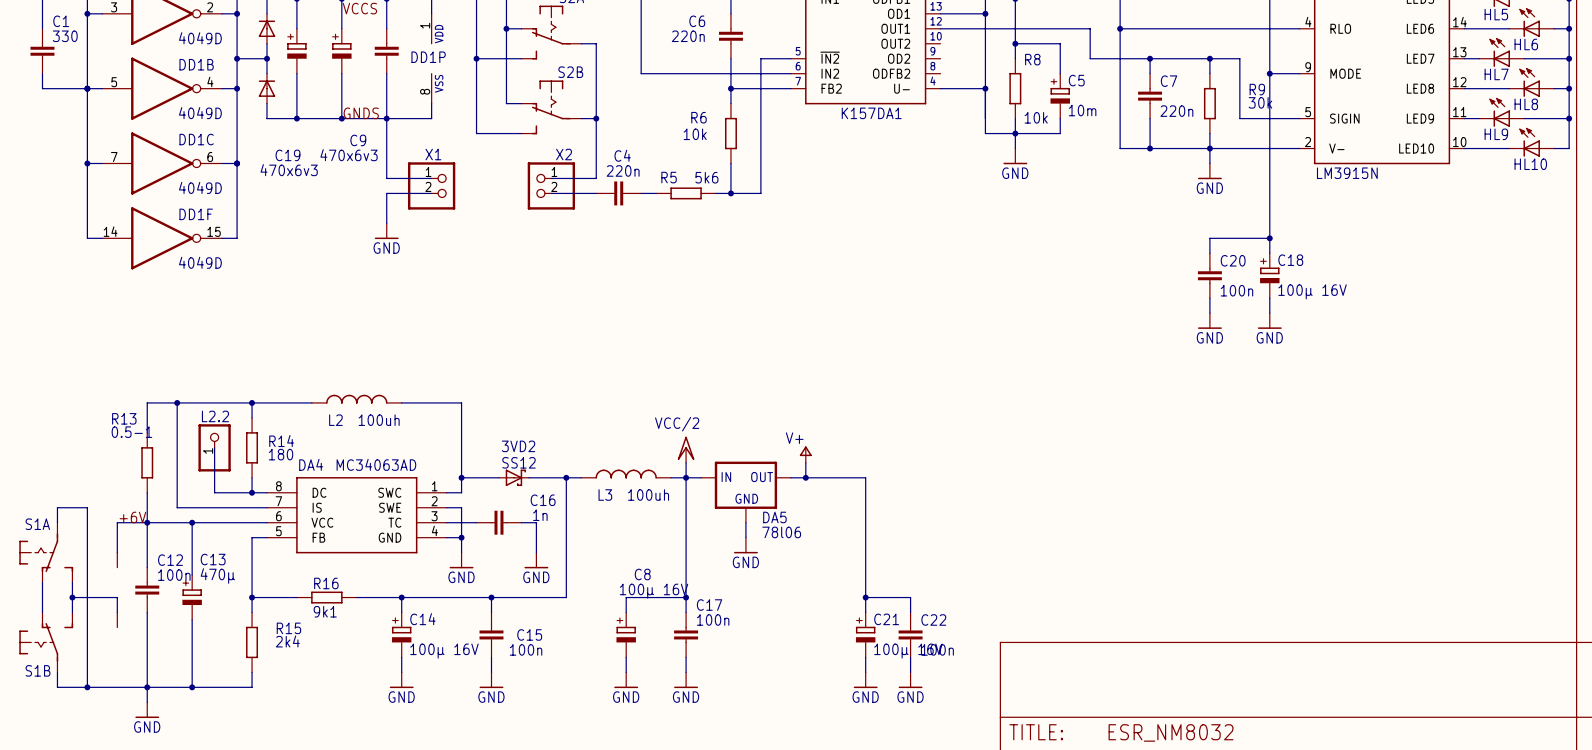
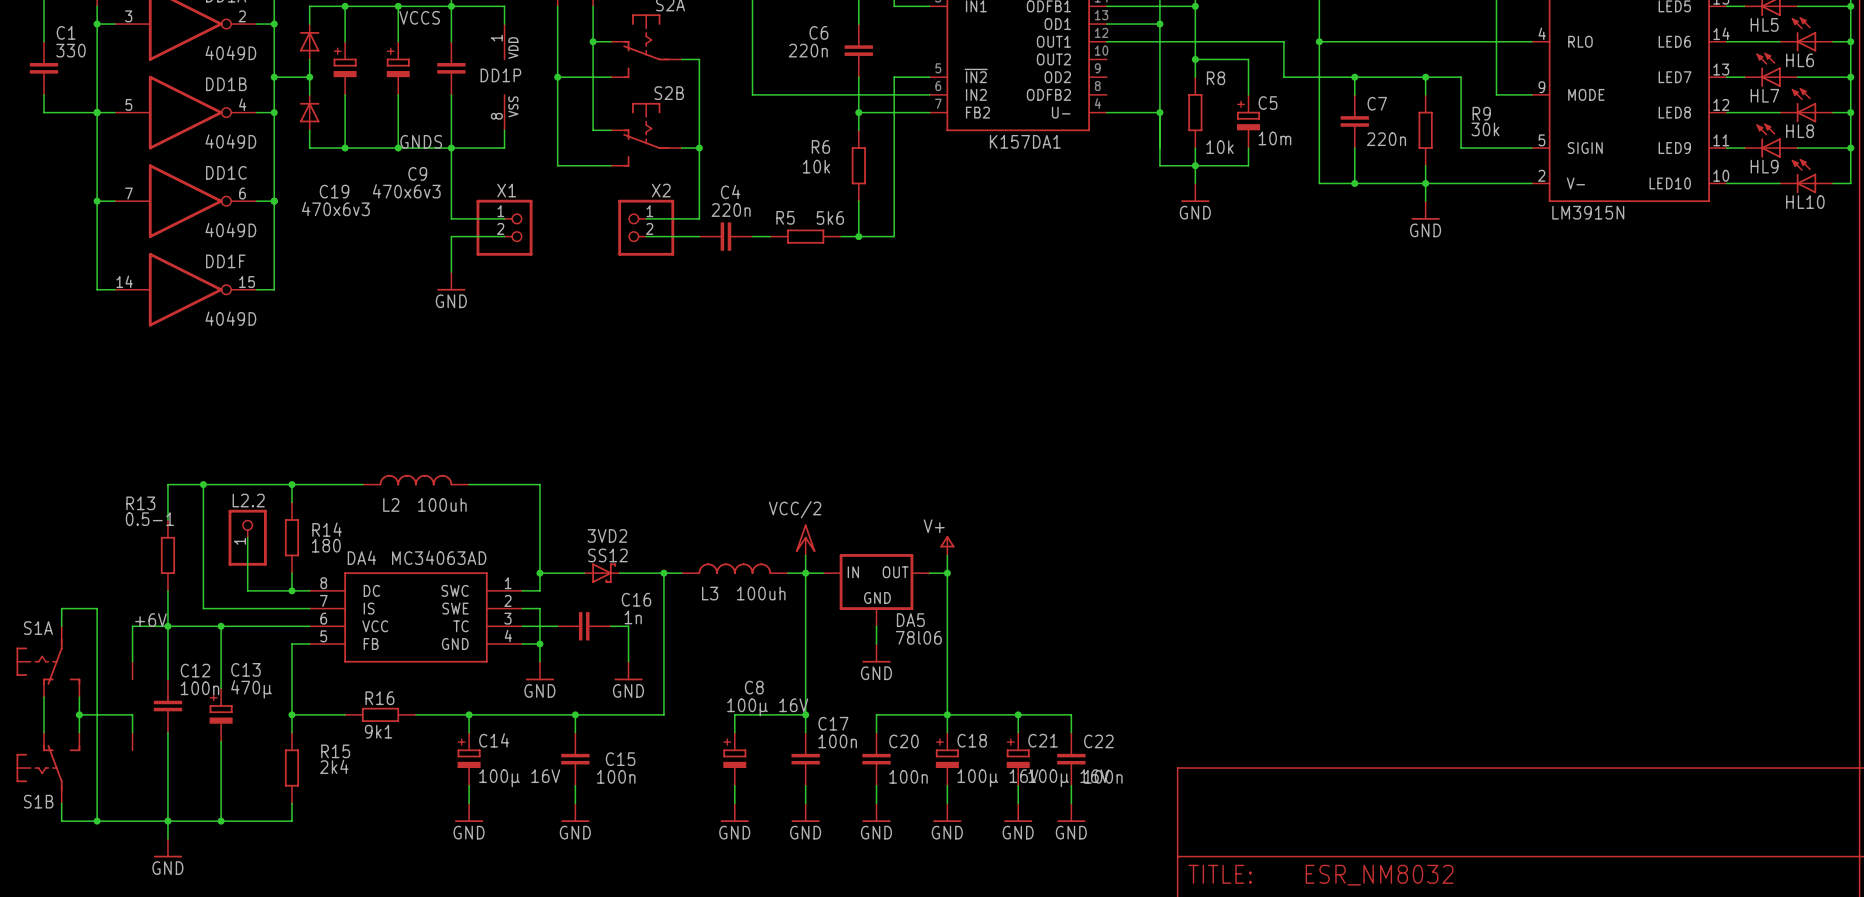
wire: (1269, 73) (1269, 253) -> none
junction: (1269, 73) -> none
wire: (1269, 238) (1209, 238) (1209, 253) -> none
junction: (1269, 238) -> none
C20 position: (1209, 275) -> (876, 759)
C18 position: (1269, 275) -> (947, 759)
wire: (1209, 298) (1209, 313) -> none
wire: (1269, 298) (1269, 313) -> none
power symbol: GND (1209, 321) -> none
power symbol: GND (1269, 321) -> none
wire: (805, 477) (865, 477) (865, 597) -> (947, 573) (947, 732)
junction: none -> (947, 714)
wire: none -> (1018, 714) (876, 714) (876, 732)
wire: none -> (876, 785) (876, 803)
wire: none -> (947, 785) (947, 803)
power symbol: none -> GND (876, 812)
power symbol: none -> GND (947, 812)

